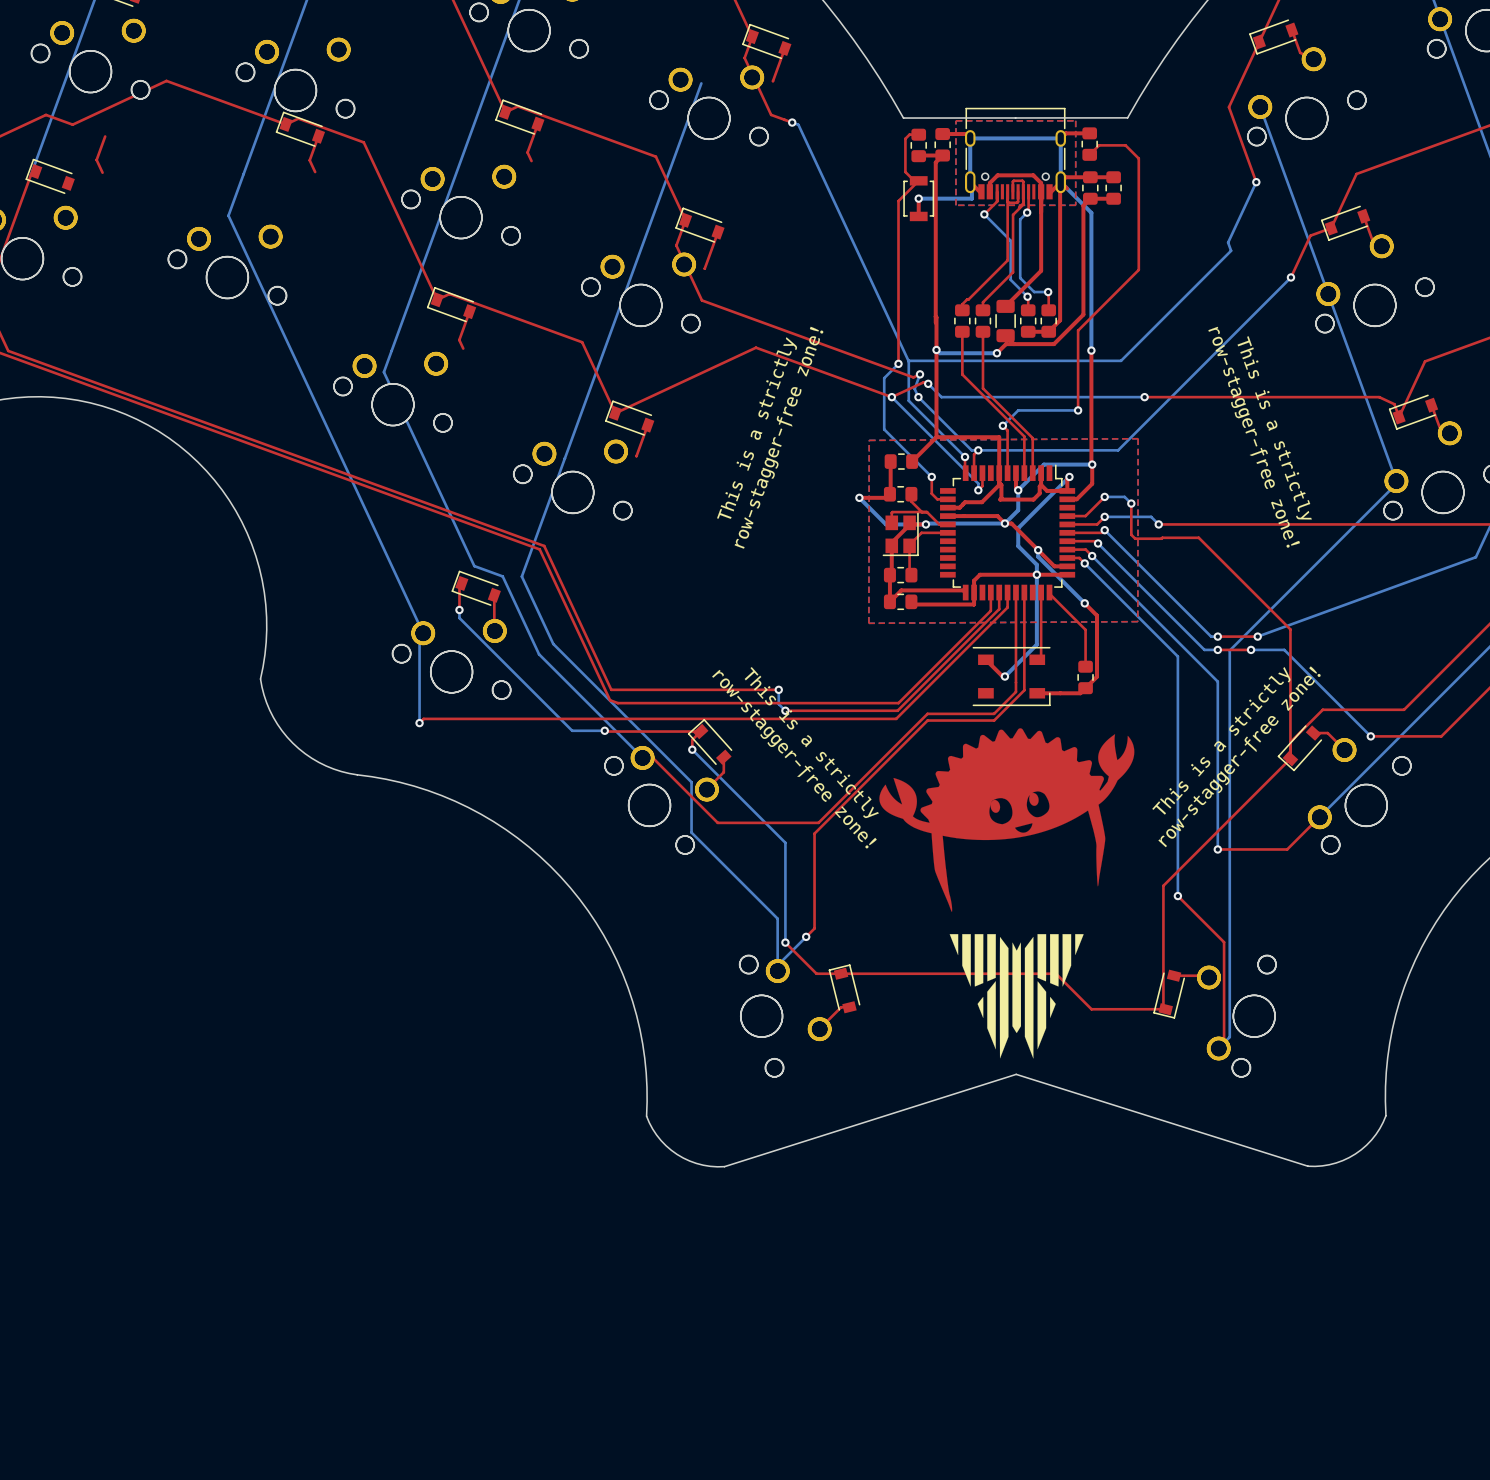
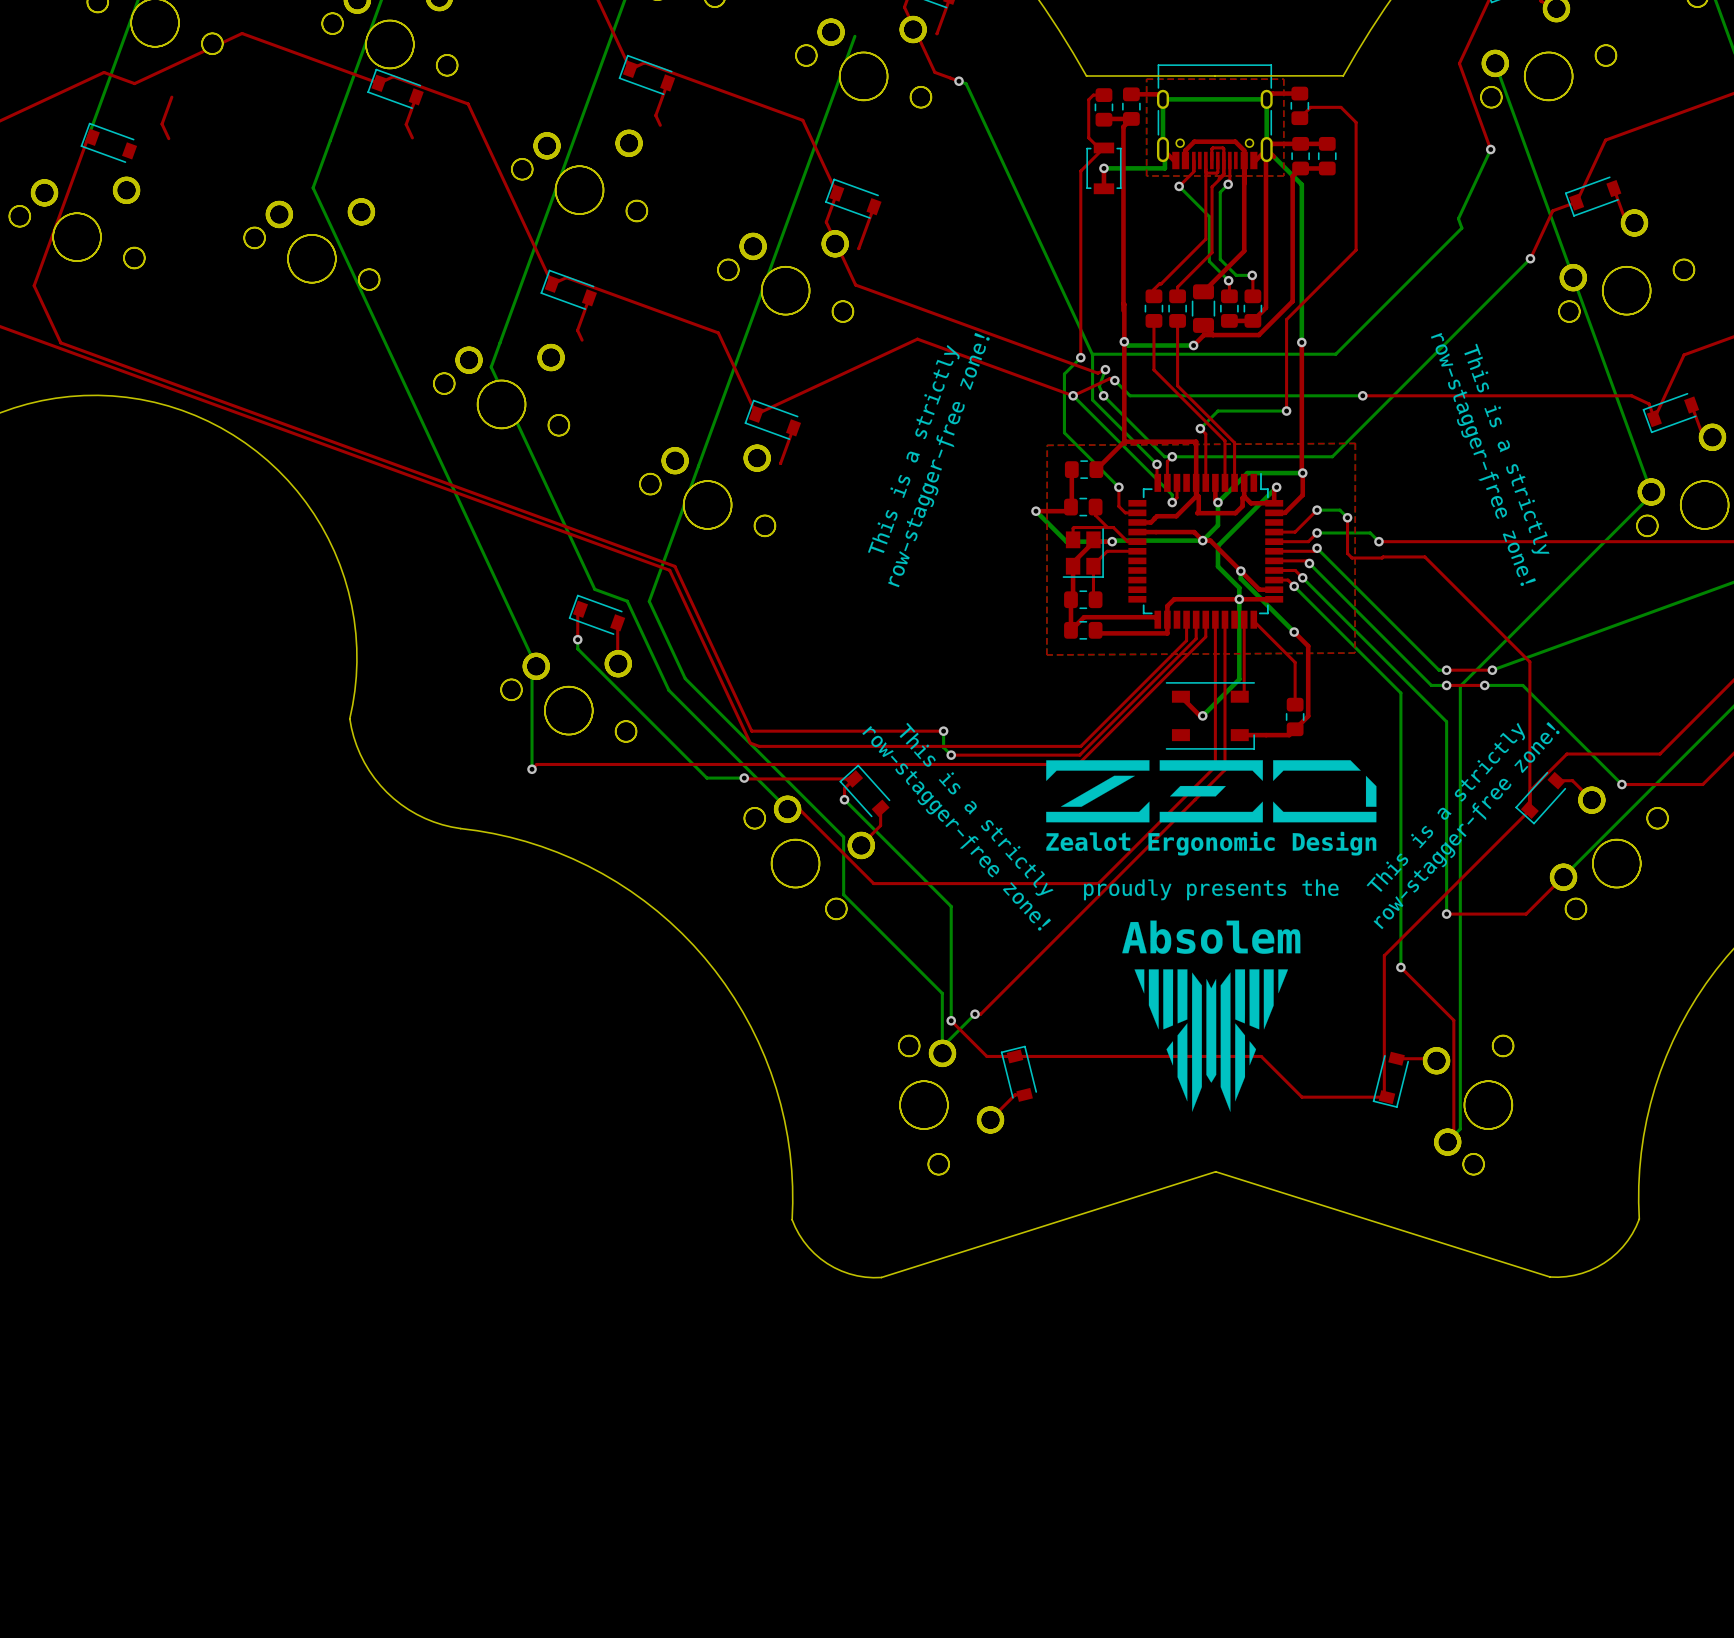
drawing: [712, 326, 1321, 1059] -> none
drawing: none -> [862, 332, 1560, 1112]
top track: (1024, 690) (994, 720) (927, 720) (814, 833) (814, 928) (806, 936) -> (1224, 731) (1224, 769) (980, 1014) (975, 1014)
top track: (1015, 691) (994, 713) (927, 713) (818, 822) -> (1215, 733) (1215, 766) (1098, 883) (989, 883)

